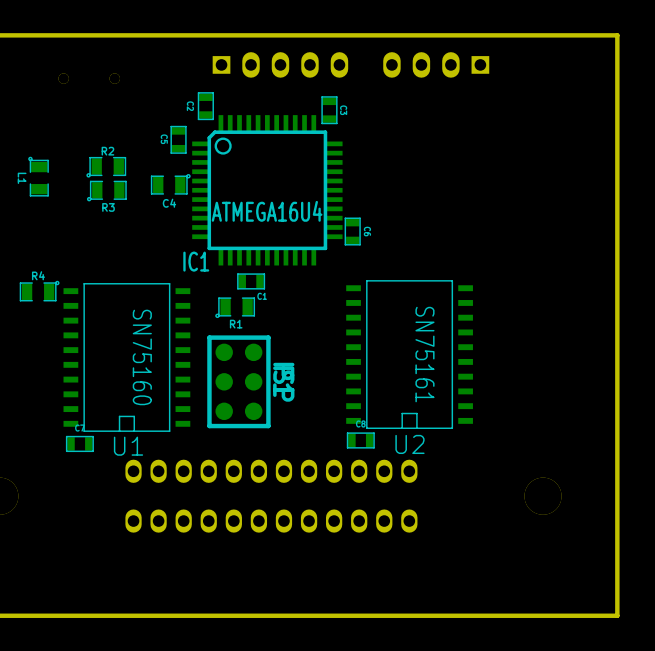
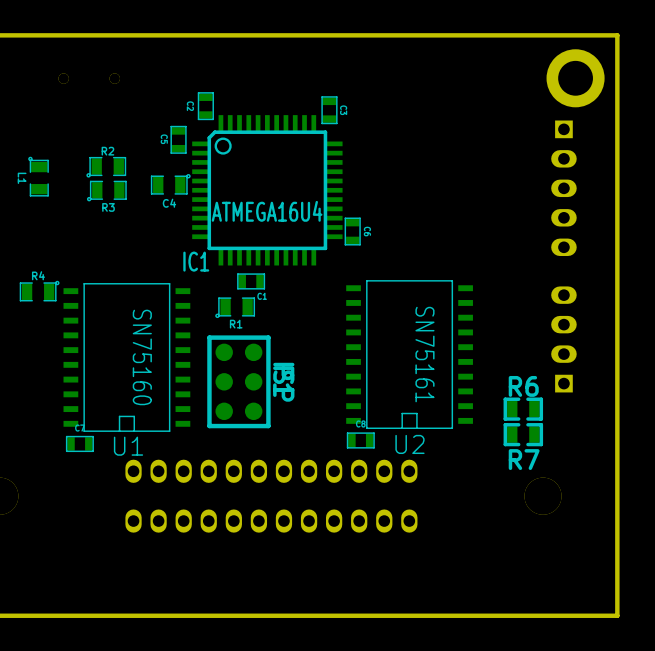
part: (280, 64) -> none
part: (436, 64) -> none
part: none -> (575, 78)
part: none -> (563, 188)
part: none -> (563, 339)
R6: none -> (523, 409)
R7: none -> (523, 434)

